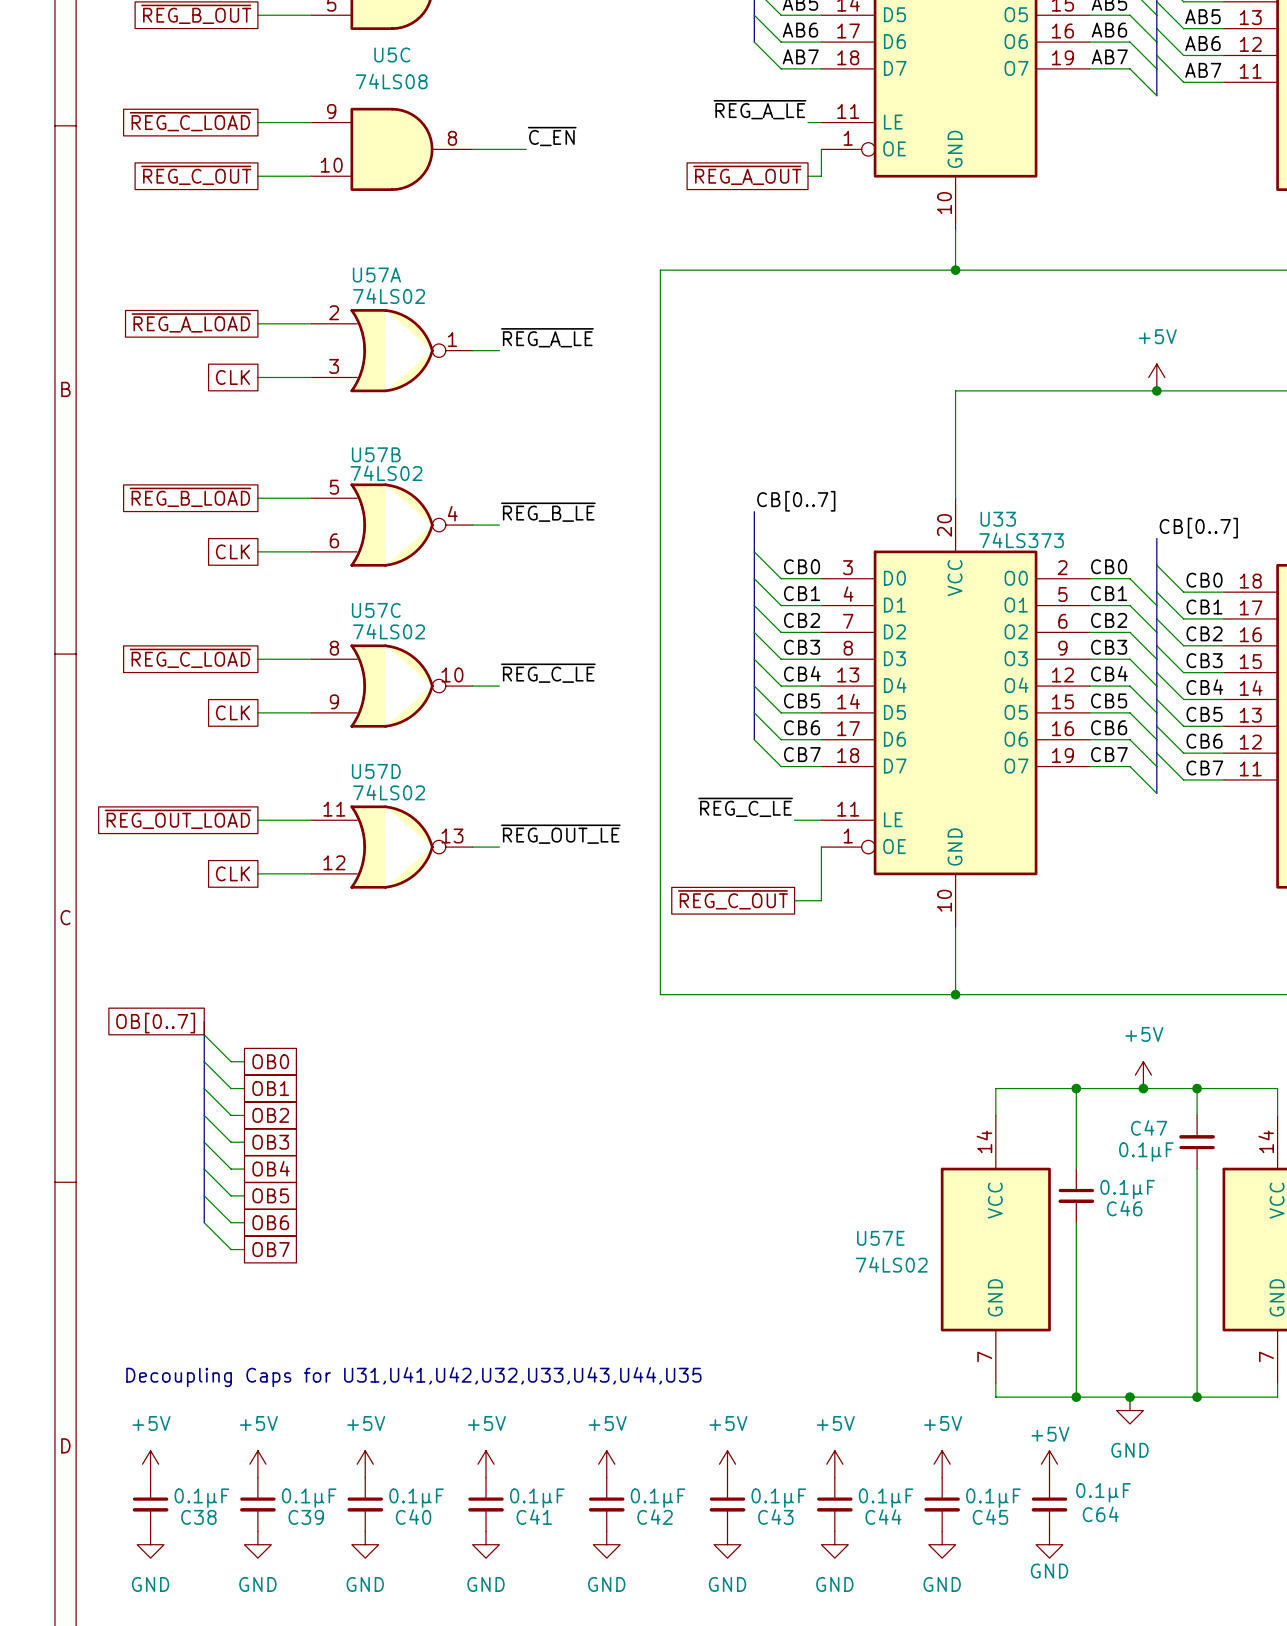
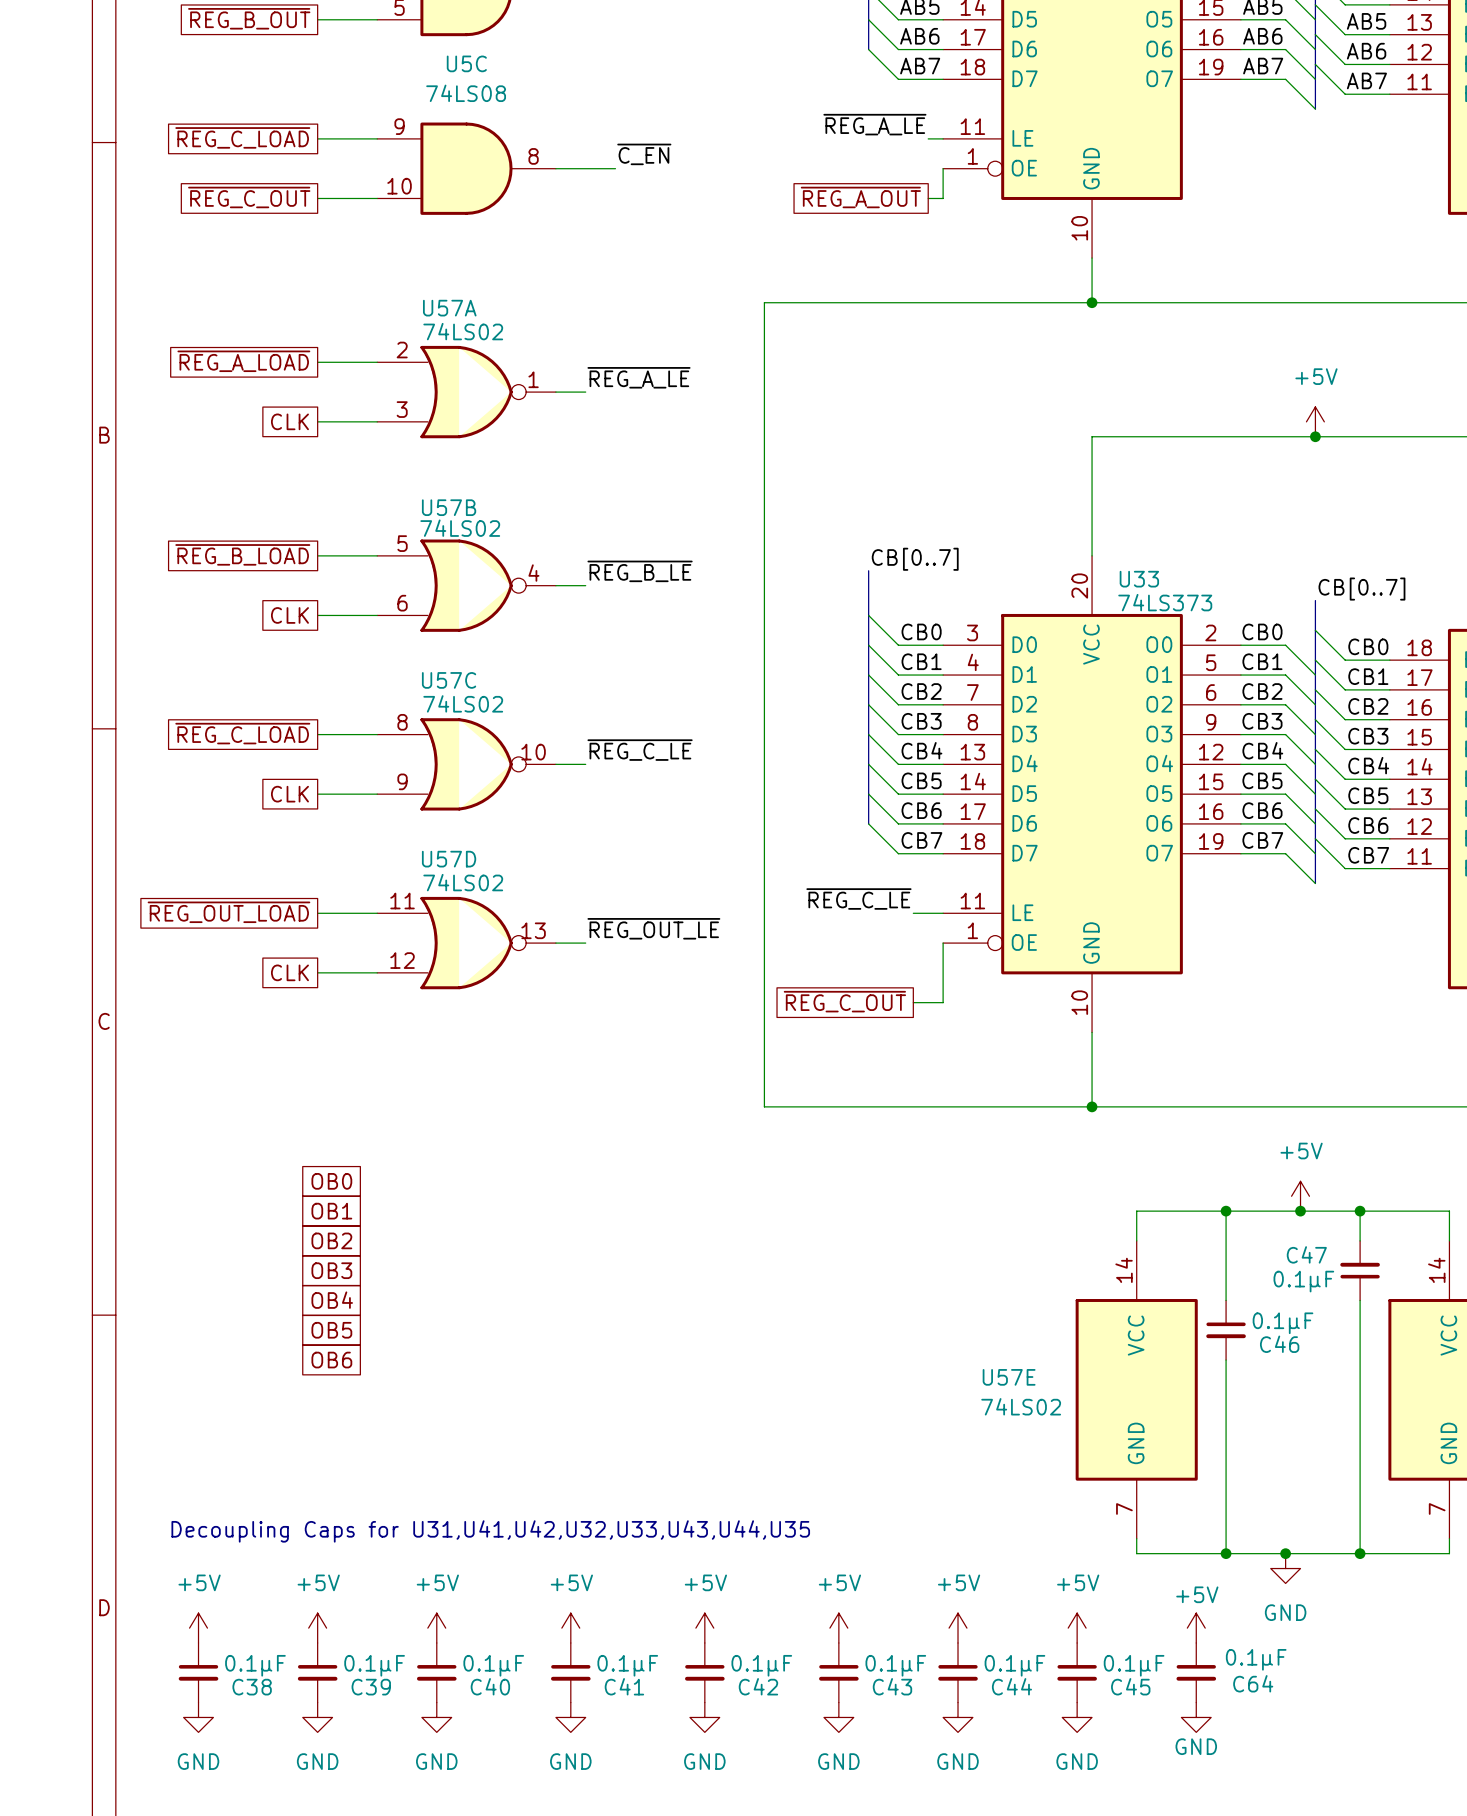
bus: (204, 1021) (204, 1222) -> none
global label: OB[0..7] (155, 1023) -> none
wire: (204, 1034) (231, 1061) (244, 1061) -> none
wire: (204, 1061) (231, 1088) (244, 1088) -> none
wire: (204, 1088) (231, 1115) (244, 1115) -> none
wire: (204, 1115) (231, 1142) (244, 1142) -> none
wire: (204, 1142) (231, 1169) (244, 1169) -> none
wire: (204, 1169) (231, 1195) (244, 1195) -> none
wire: (204, 1195) (231, 1222) (244, 1222) -> none
wire: (204, 1222) (231, 1249) (244, 1249) -> none
global label: OB7 (271, 1249) -> none

